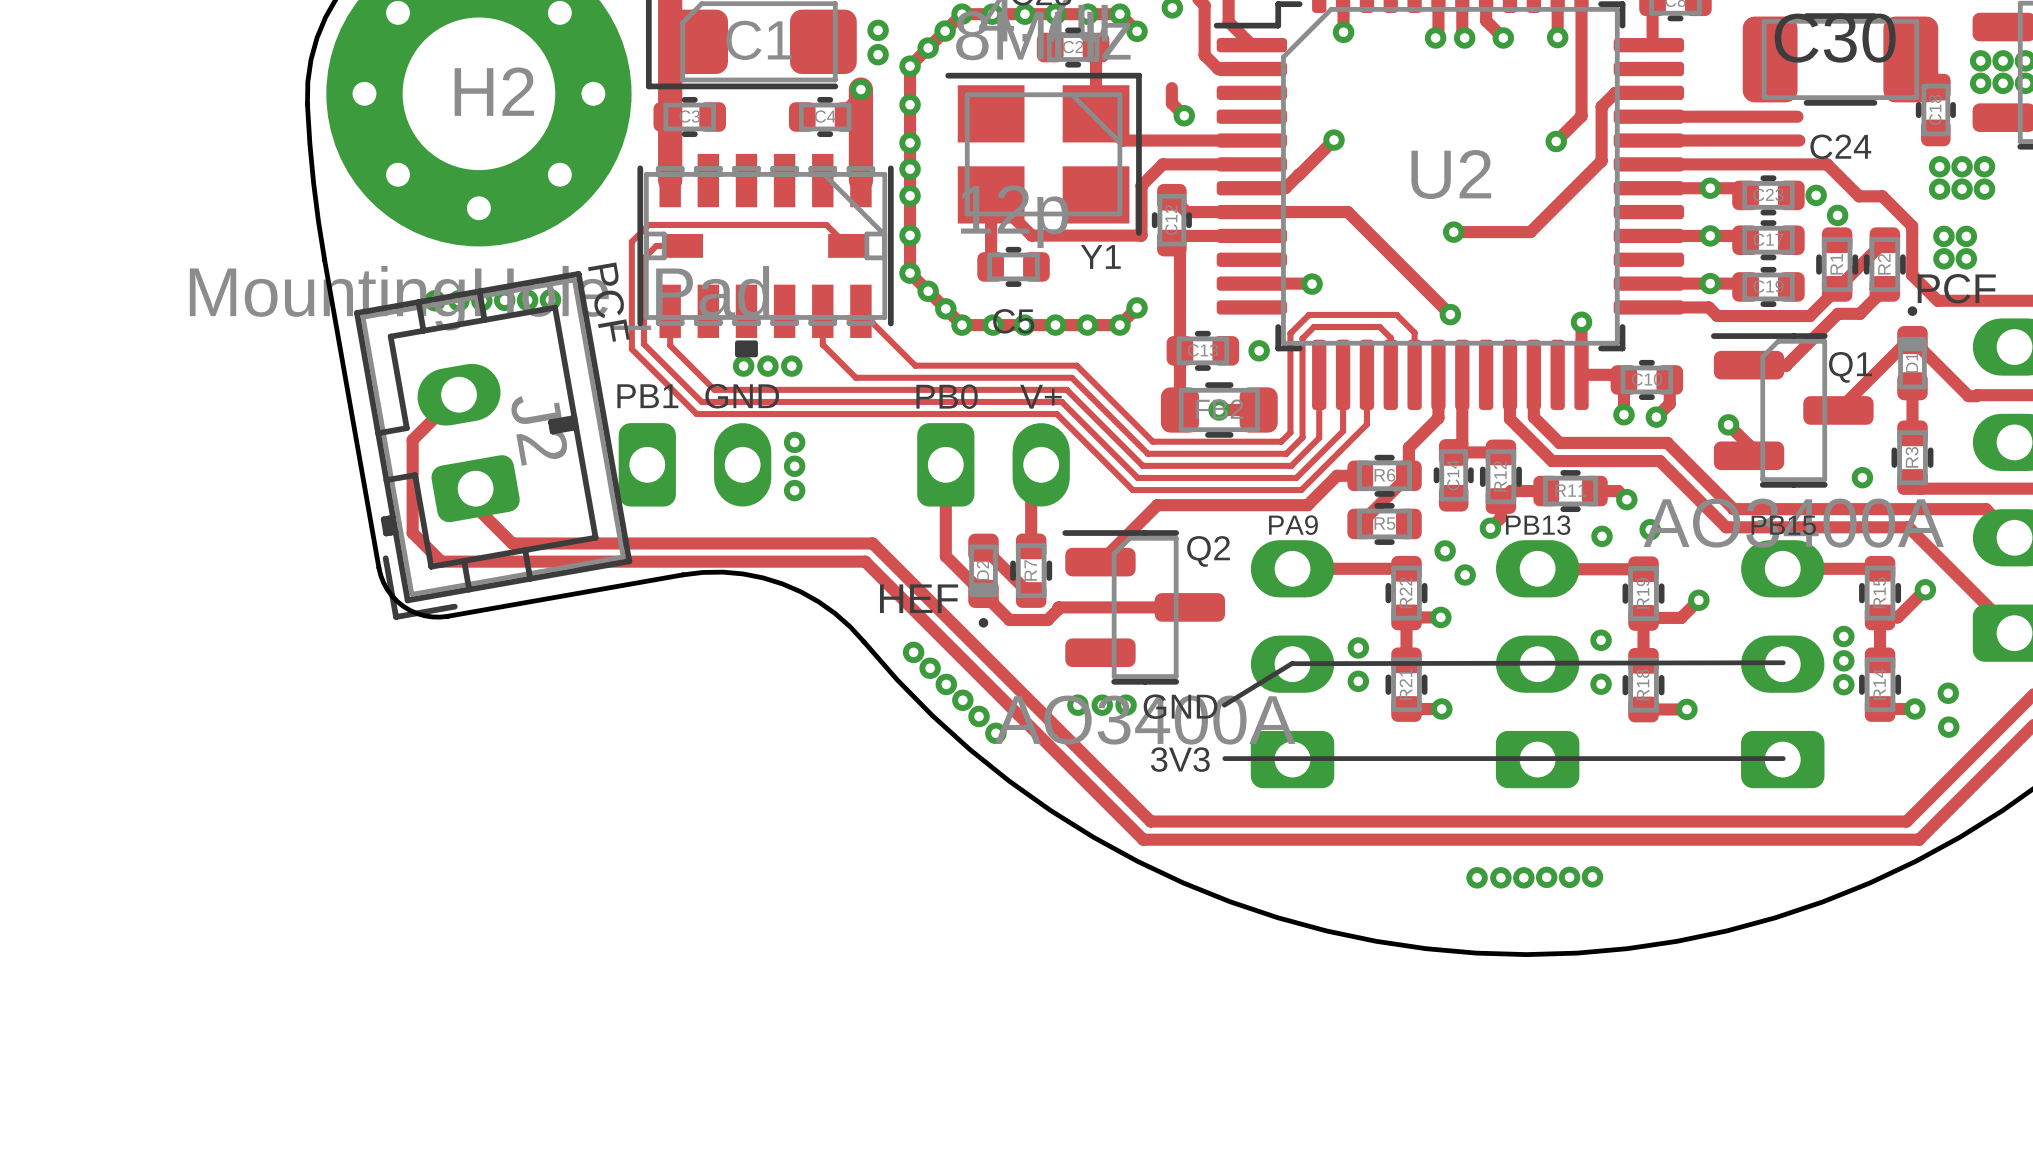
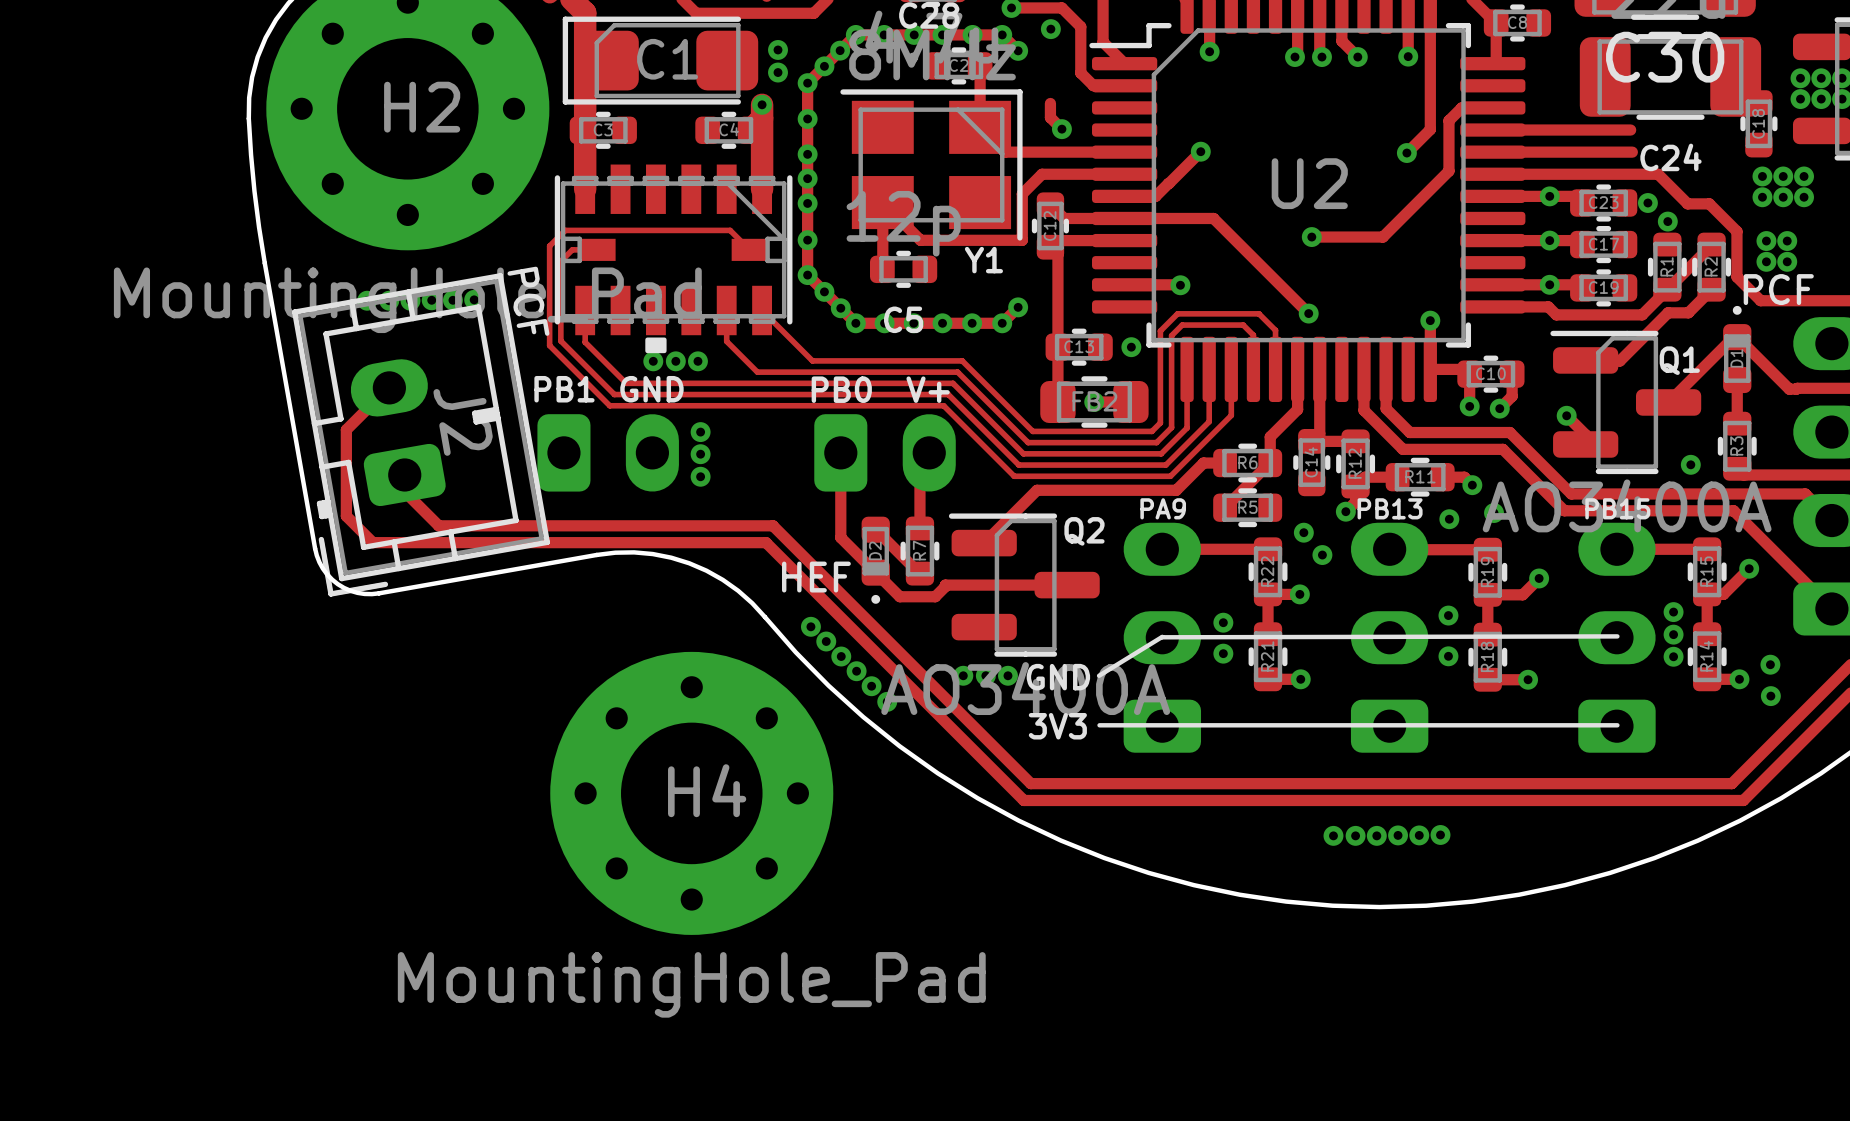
H4: none -> MountingHole_Pad (691, 793)

